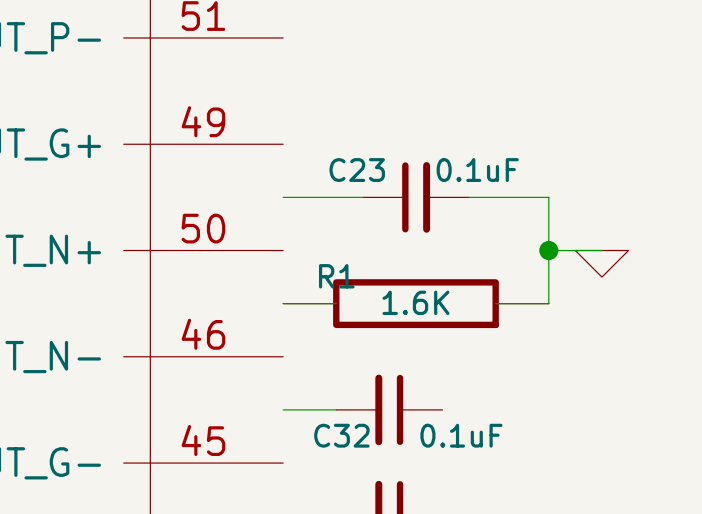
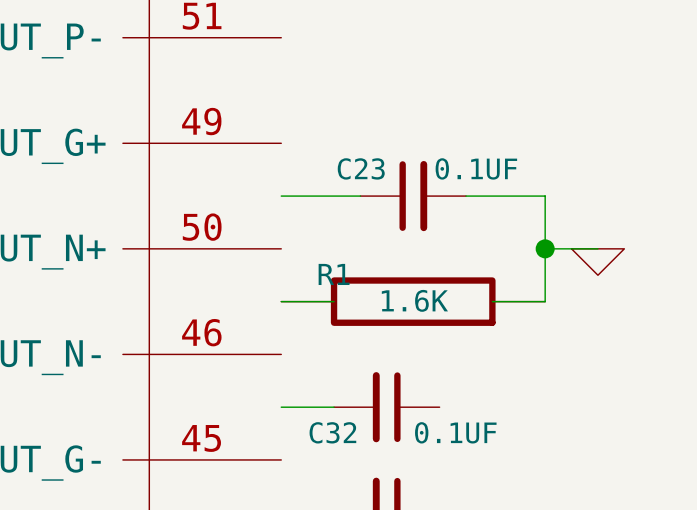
C23 value: 0.1uF (477, 170) -> 0.1UF (476, 168)
C32 value: 0.1uF (461, 435) -> 0.1UF (455, 432)

